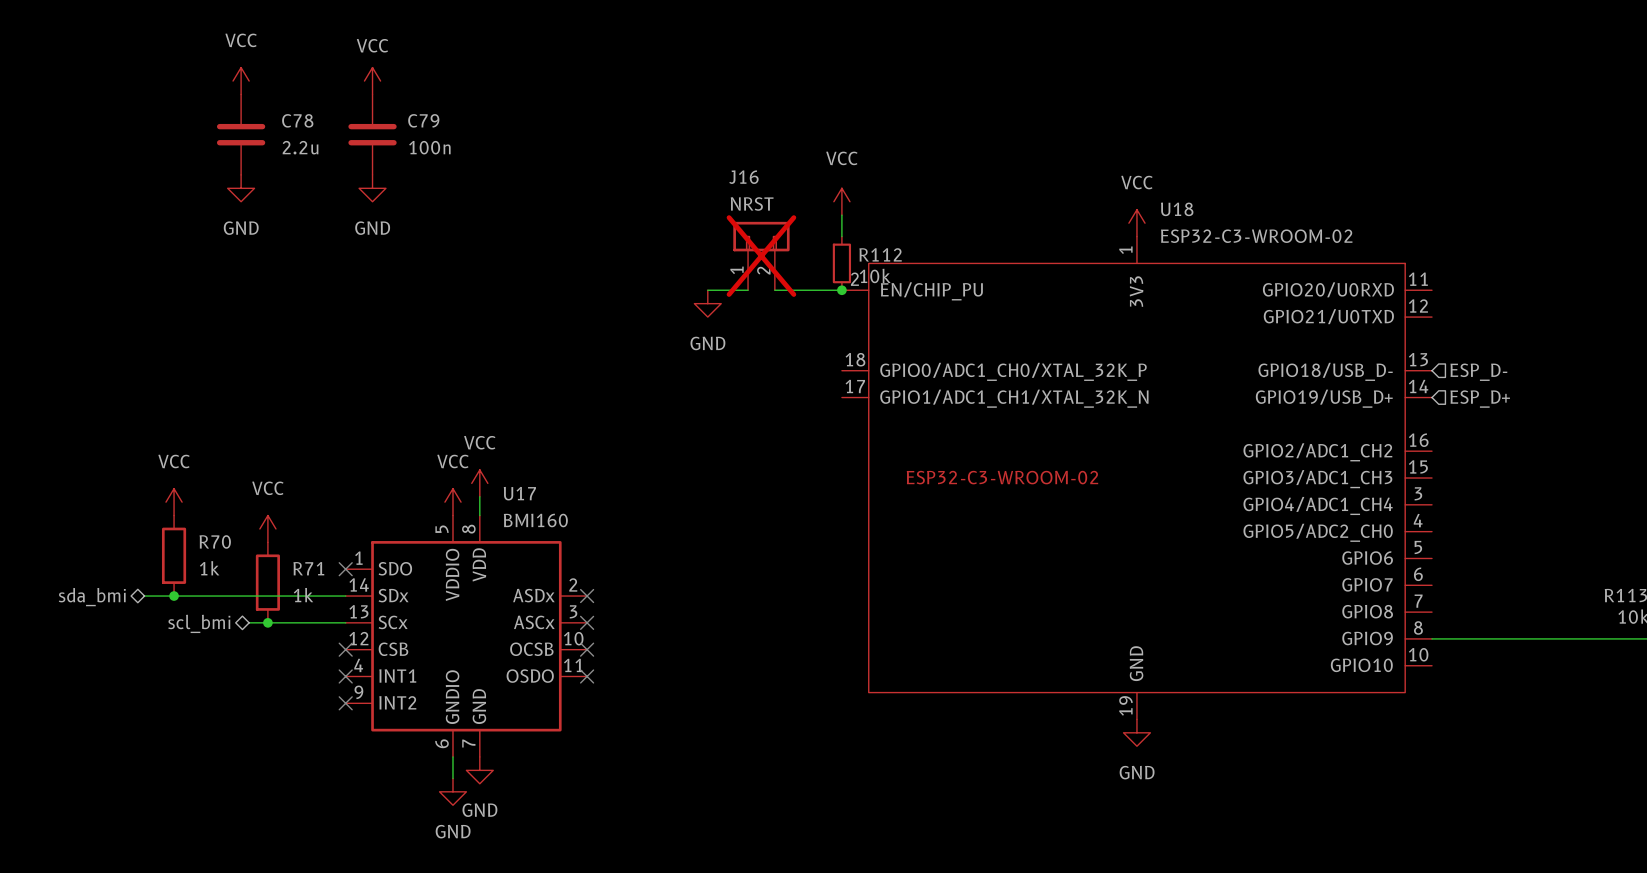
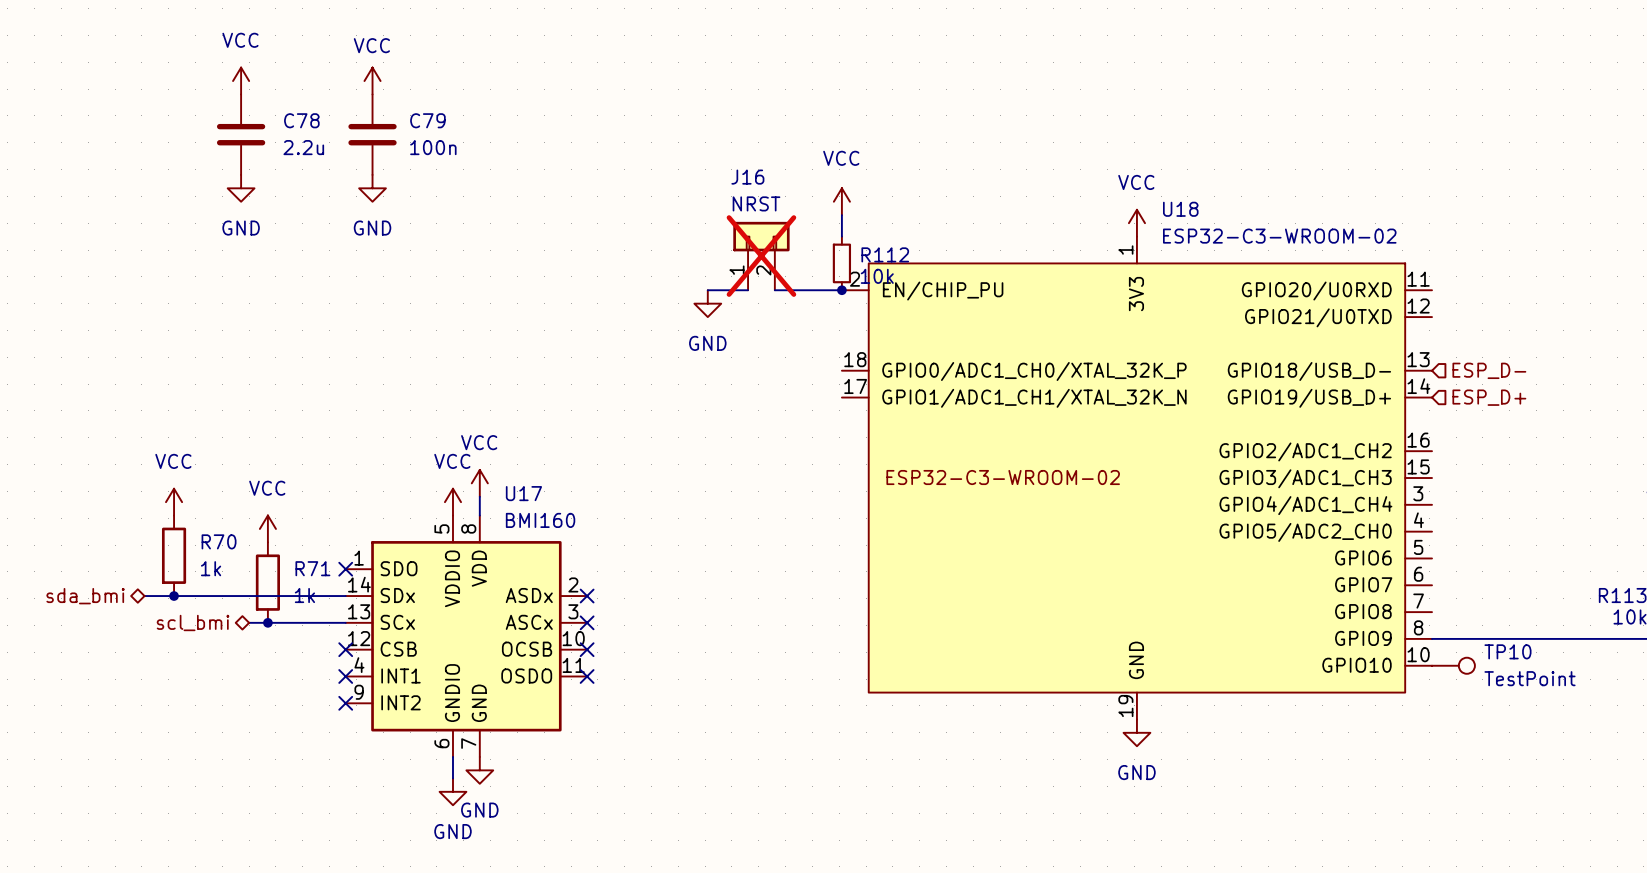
TP10: none -> TestPoint (1453, 665)

